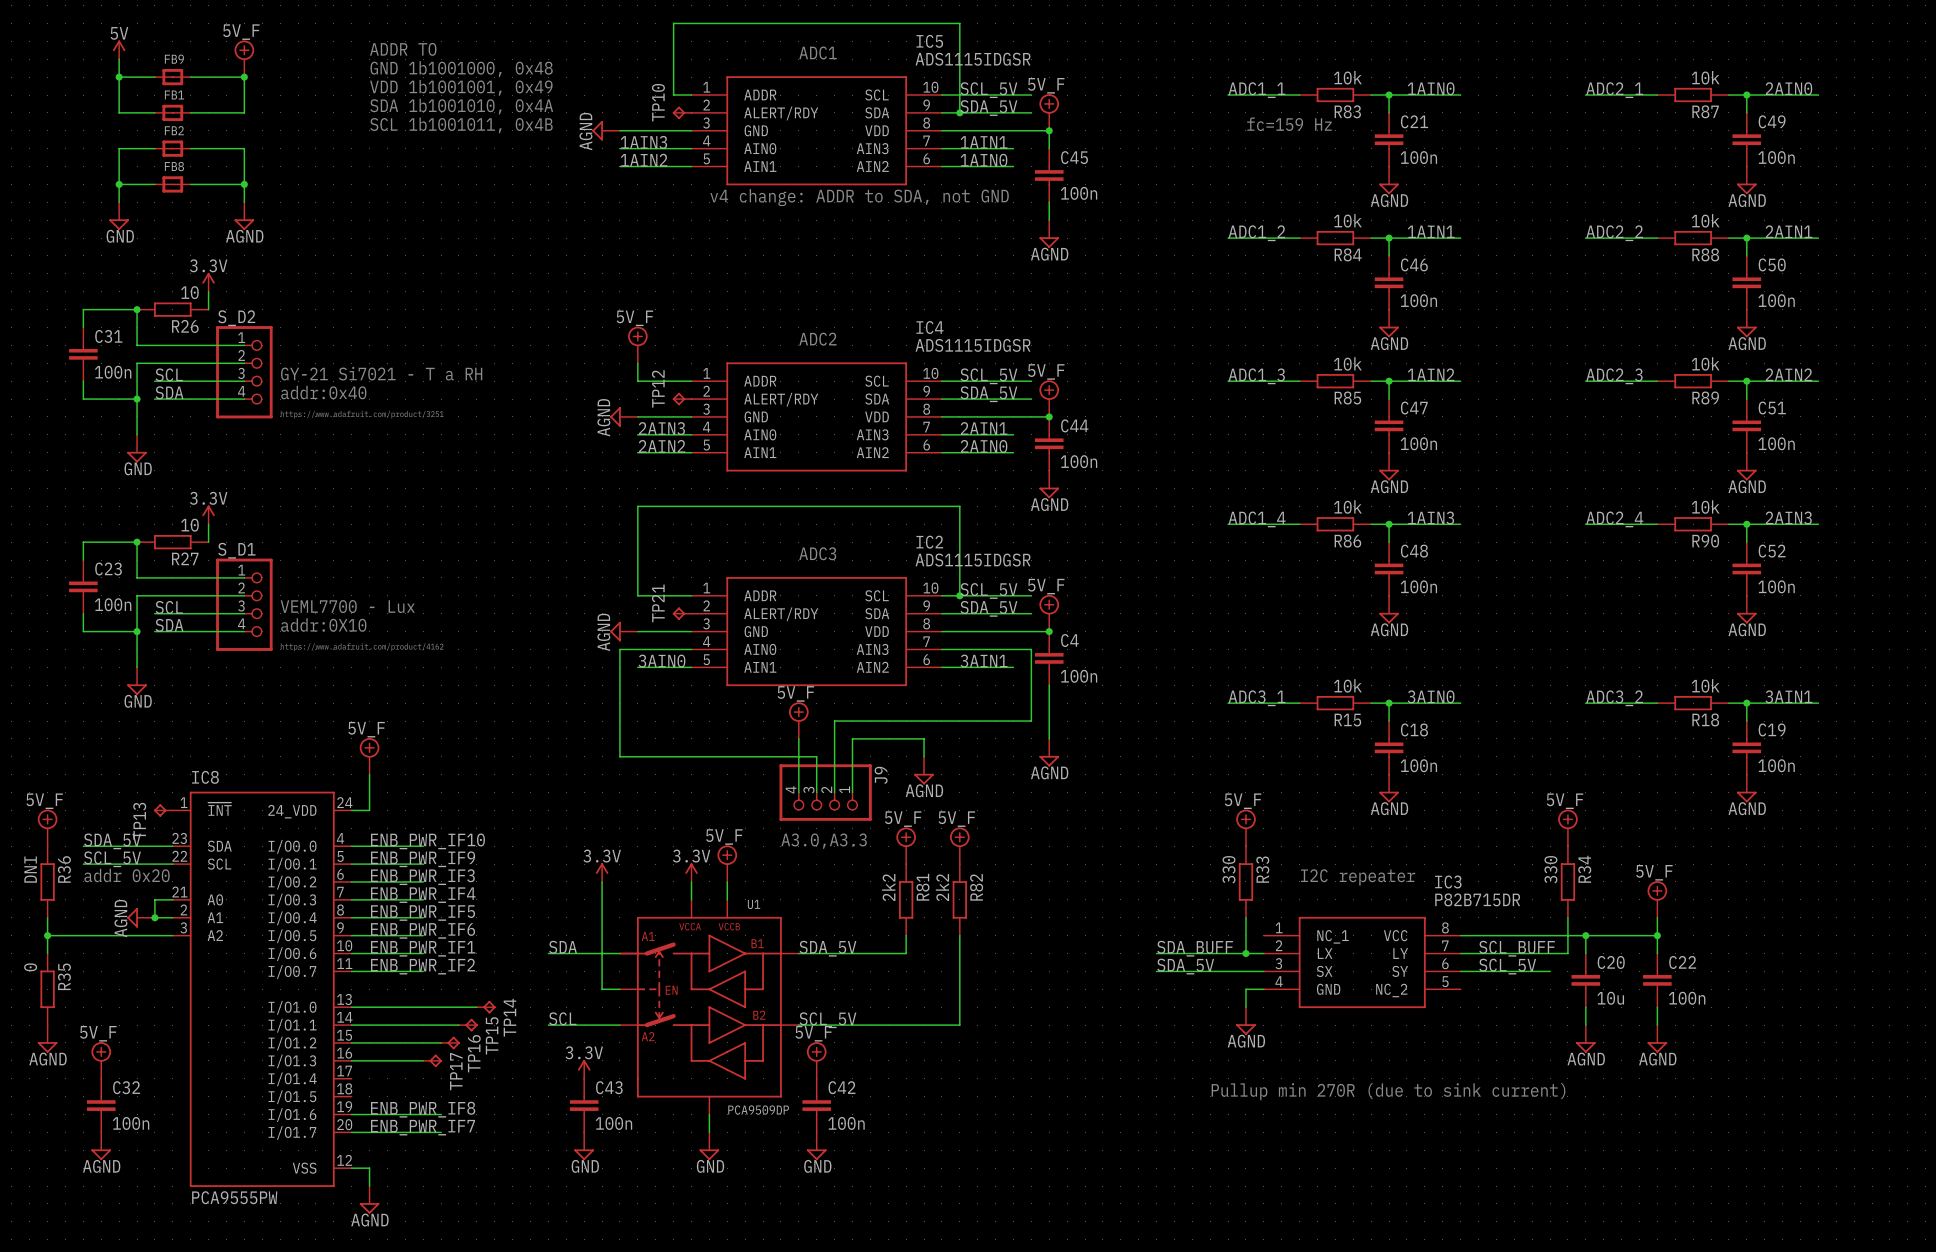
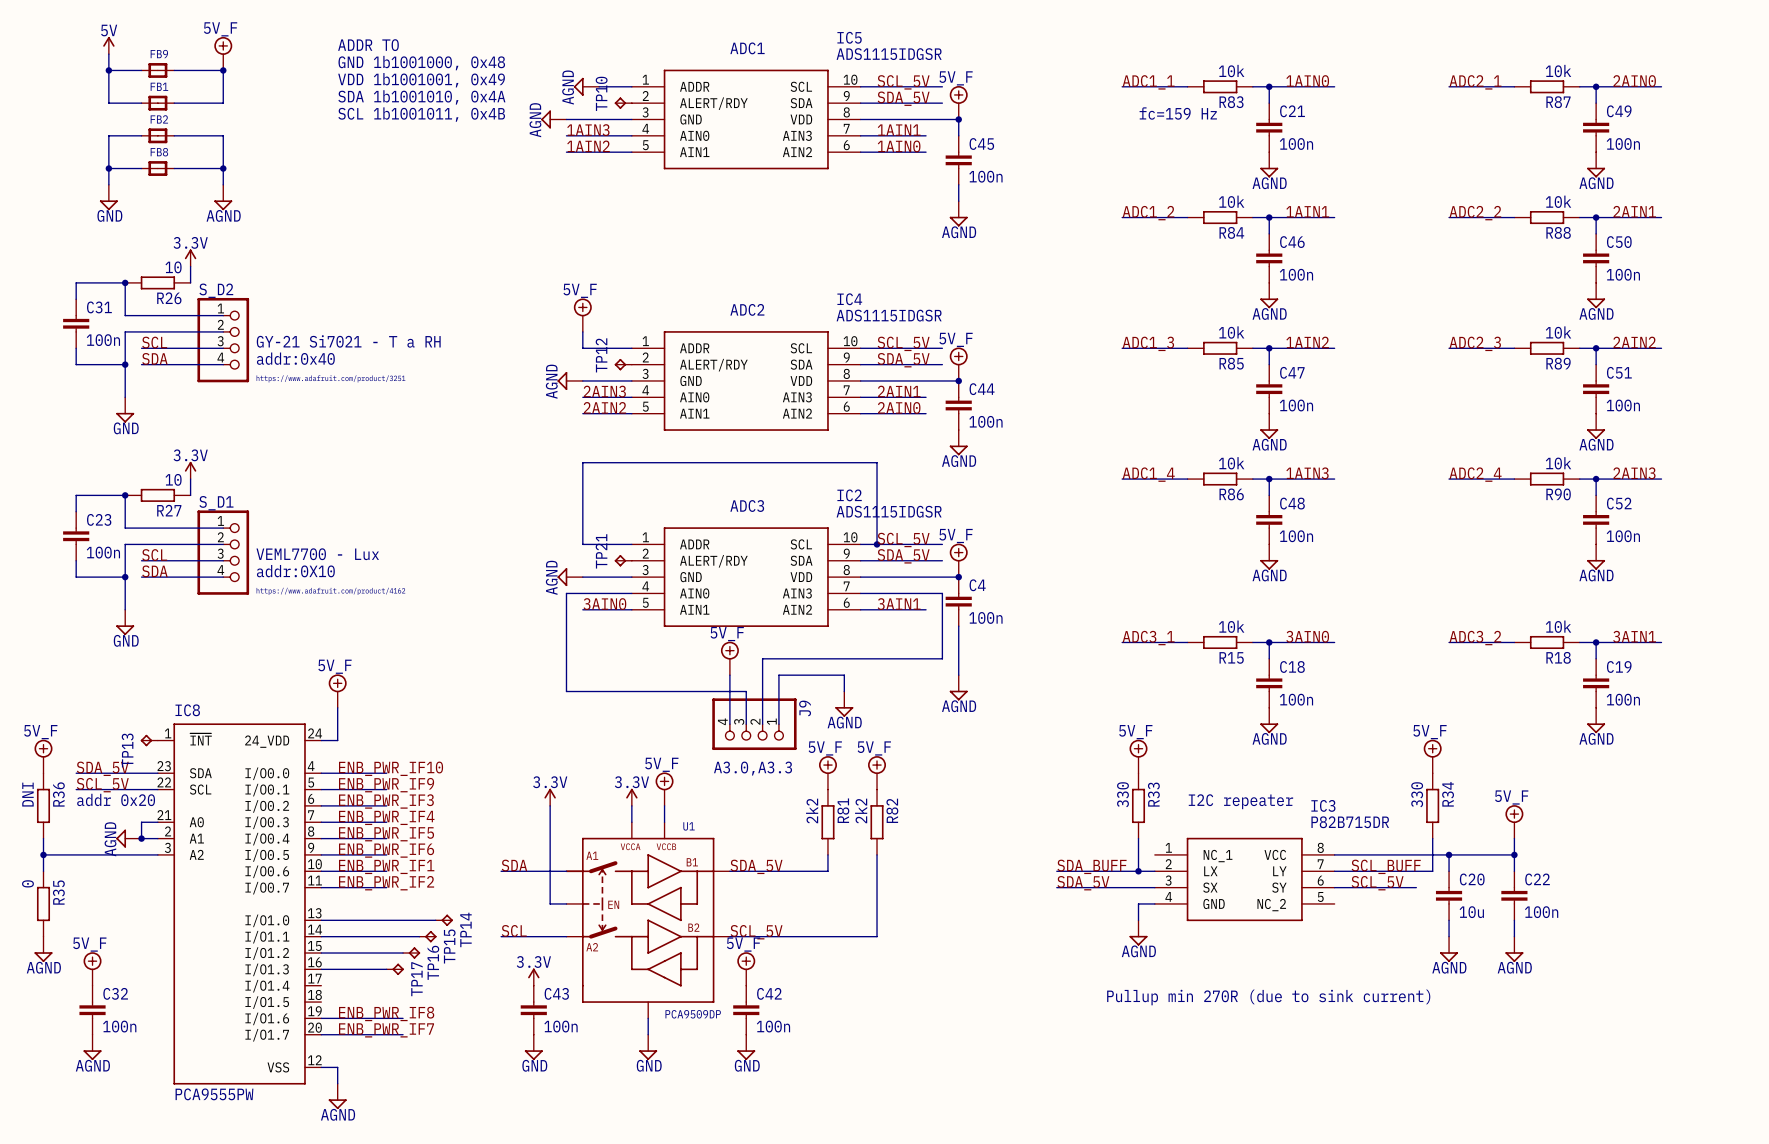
power symbol: none -> AGND (586, 86)
wire: (673, 95) (673, 23) (959, 23) (959, 112) -> (615, 86) (599, 86)
junction: (959, 112) -> none
text: v4 change: ADDR to SDA, not GND (859, 197) -> none

